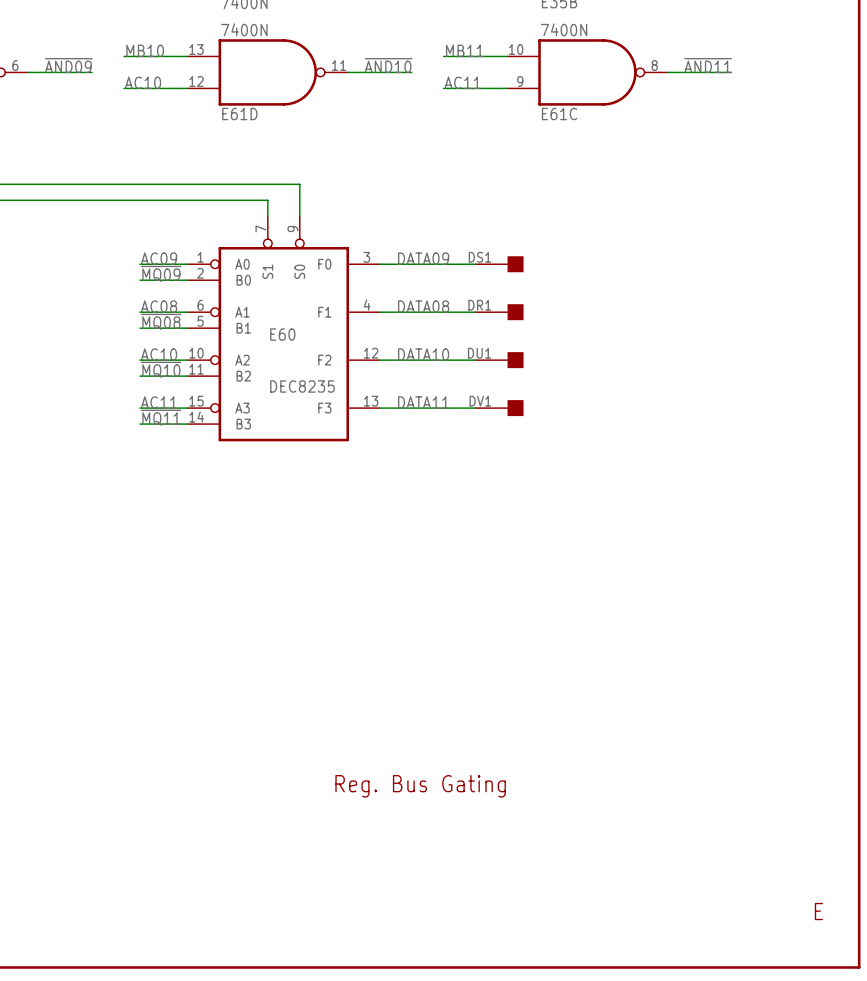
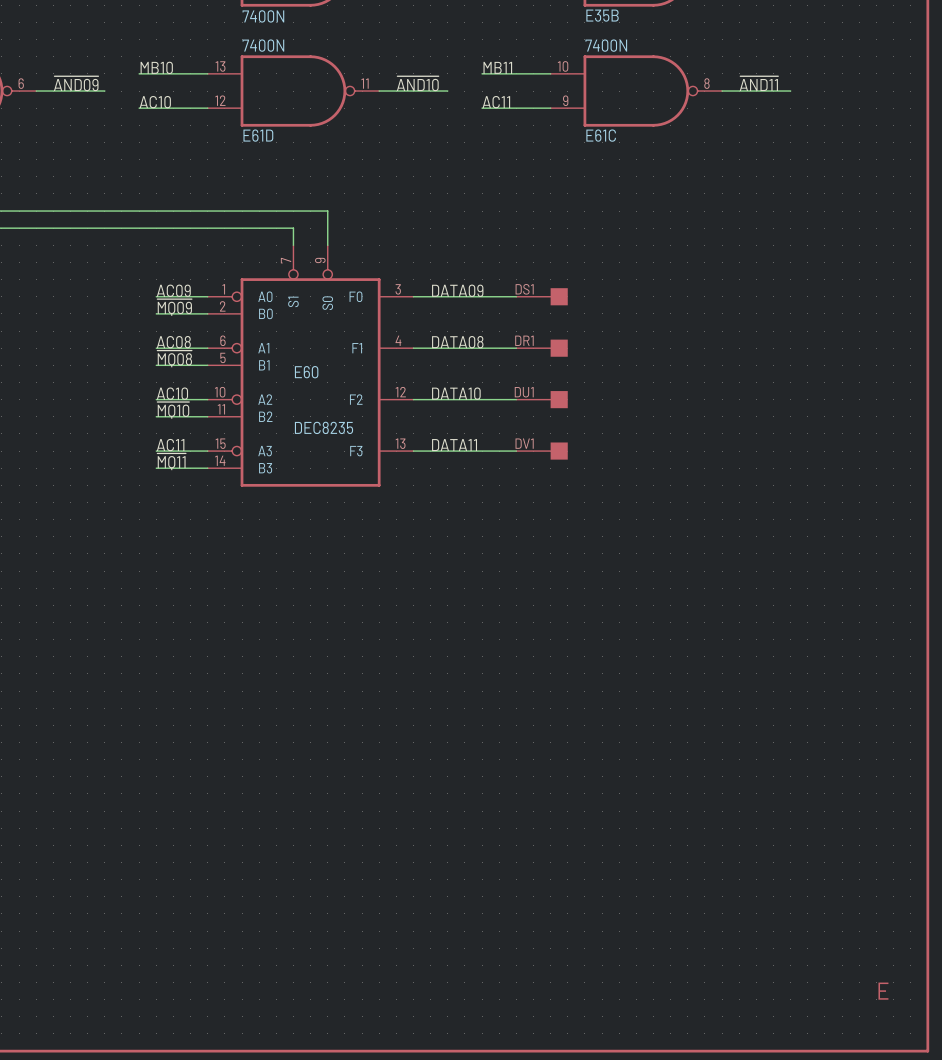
text: Reg. Bus Gating (420, 786) -> none

